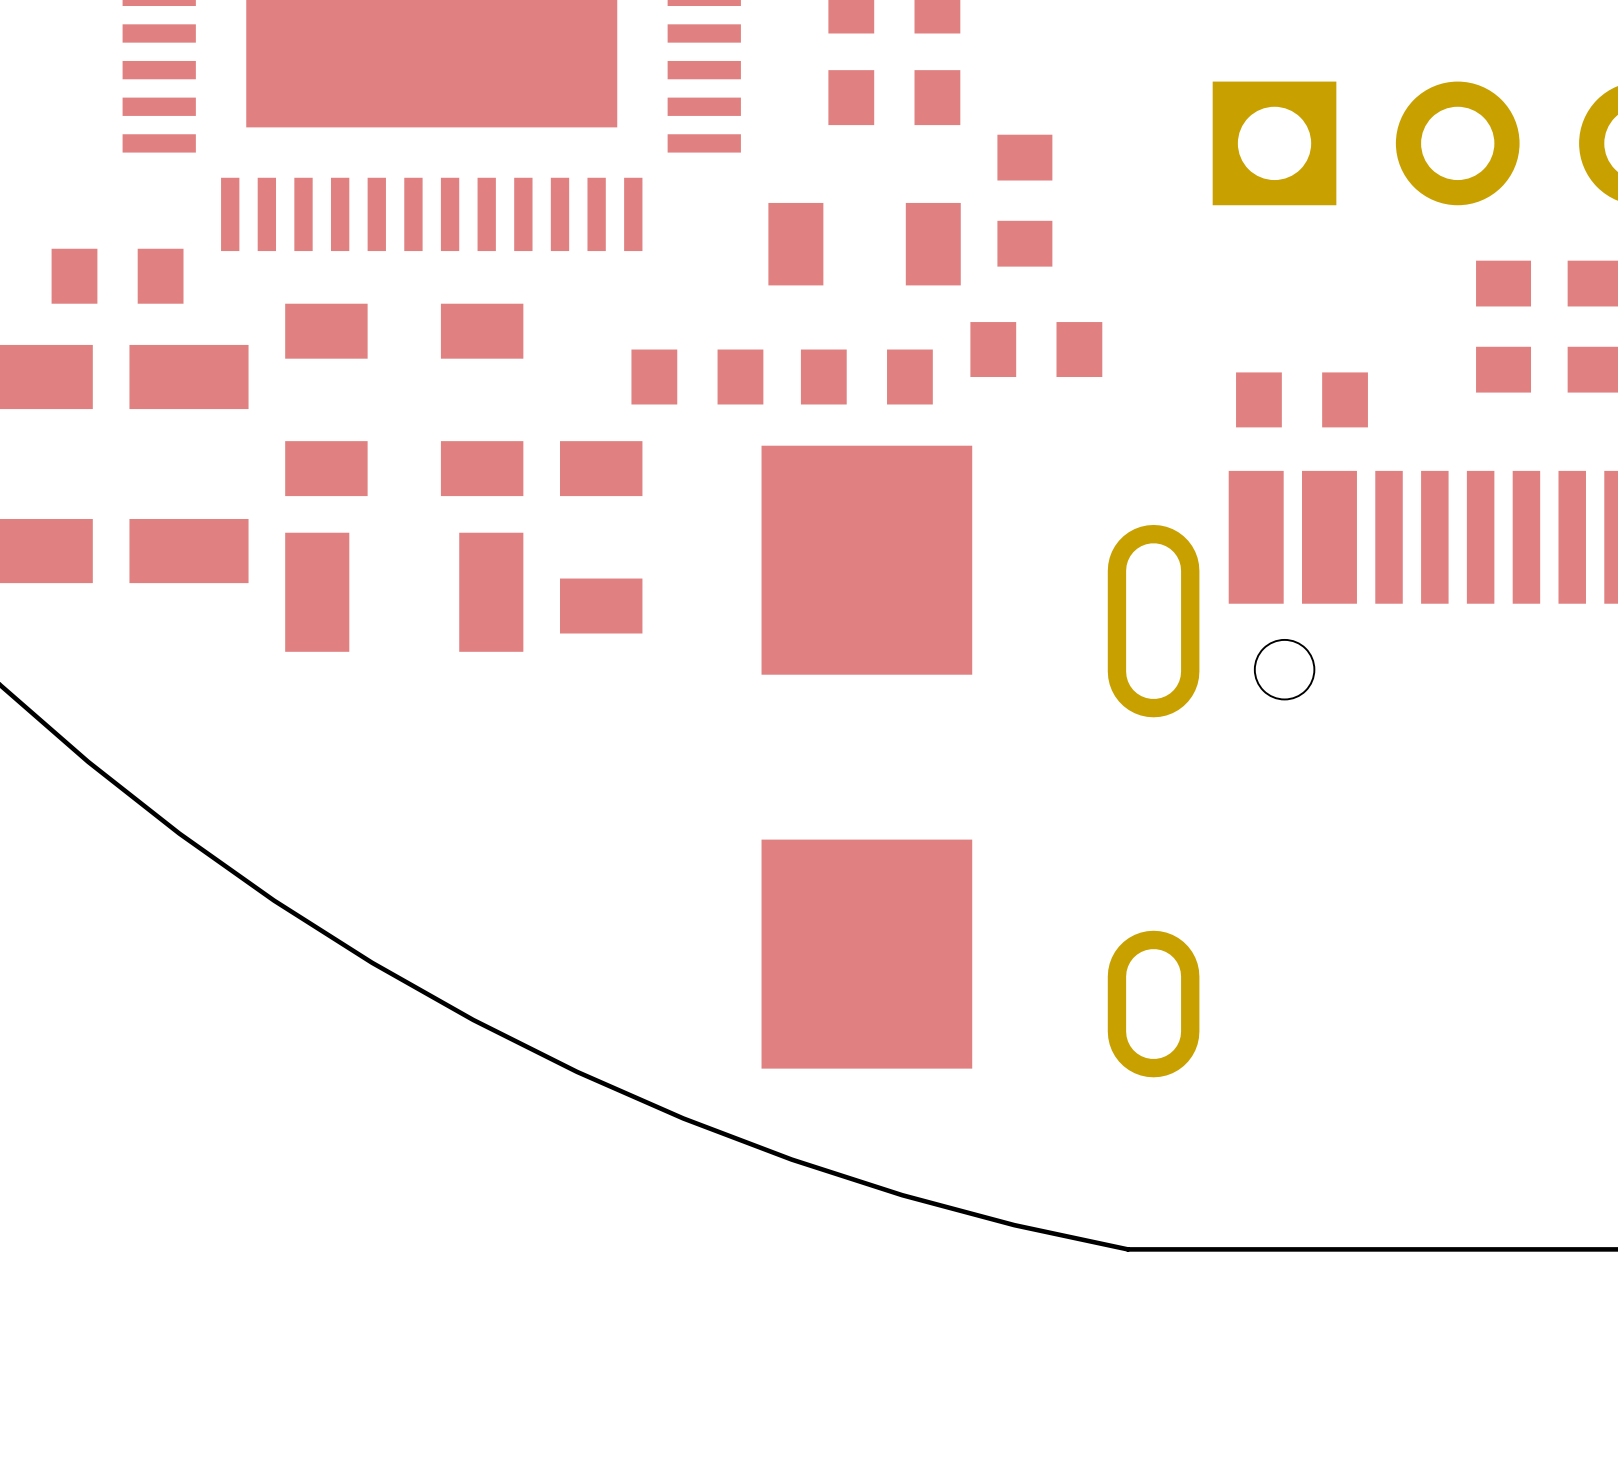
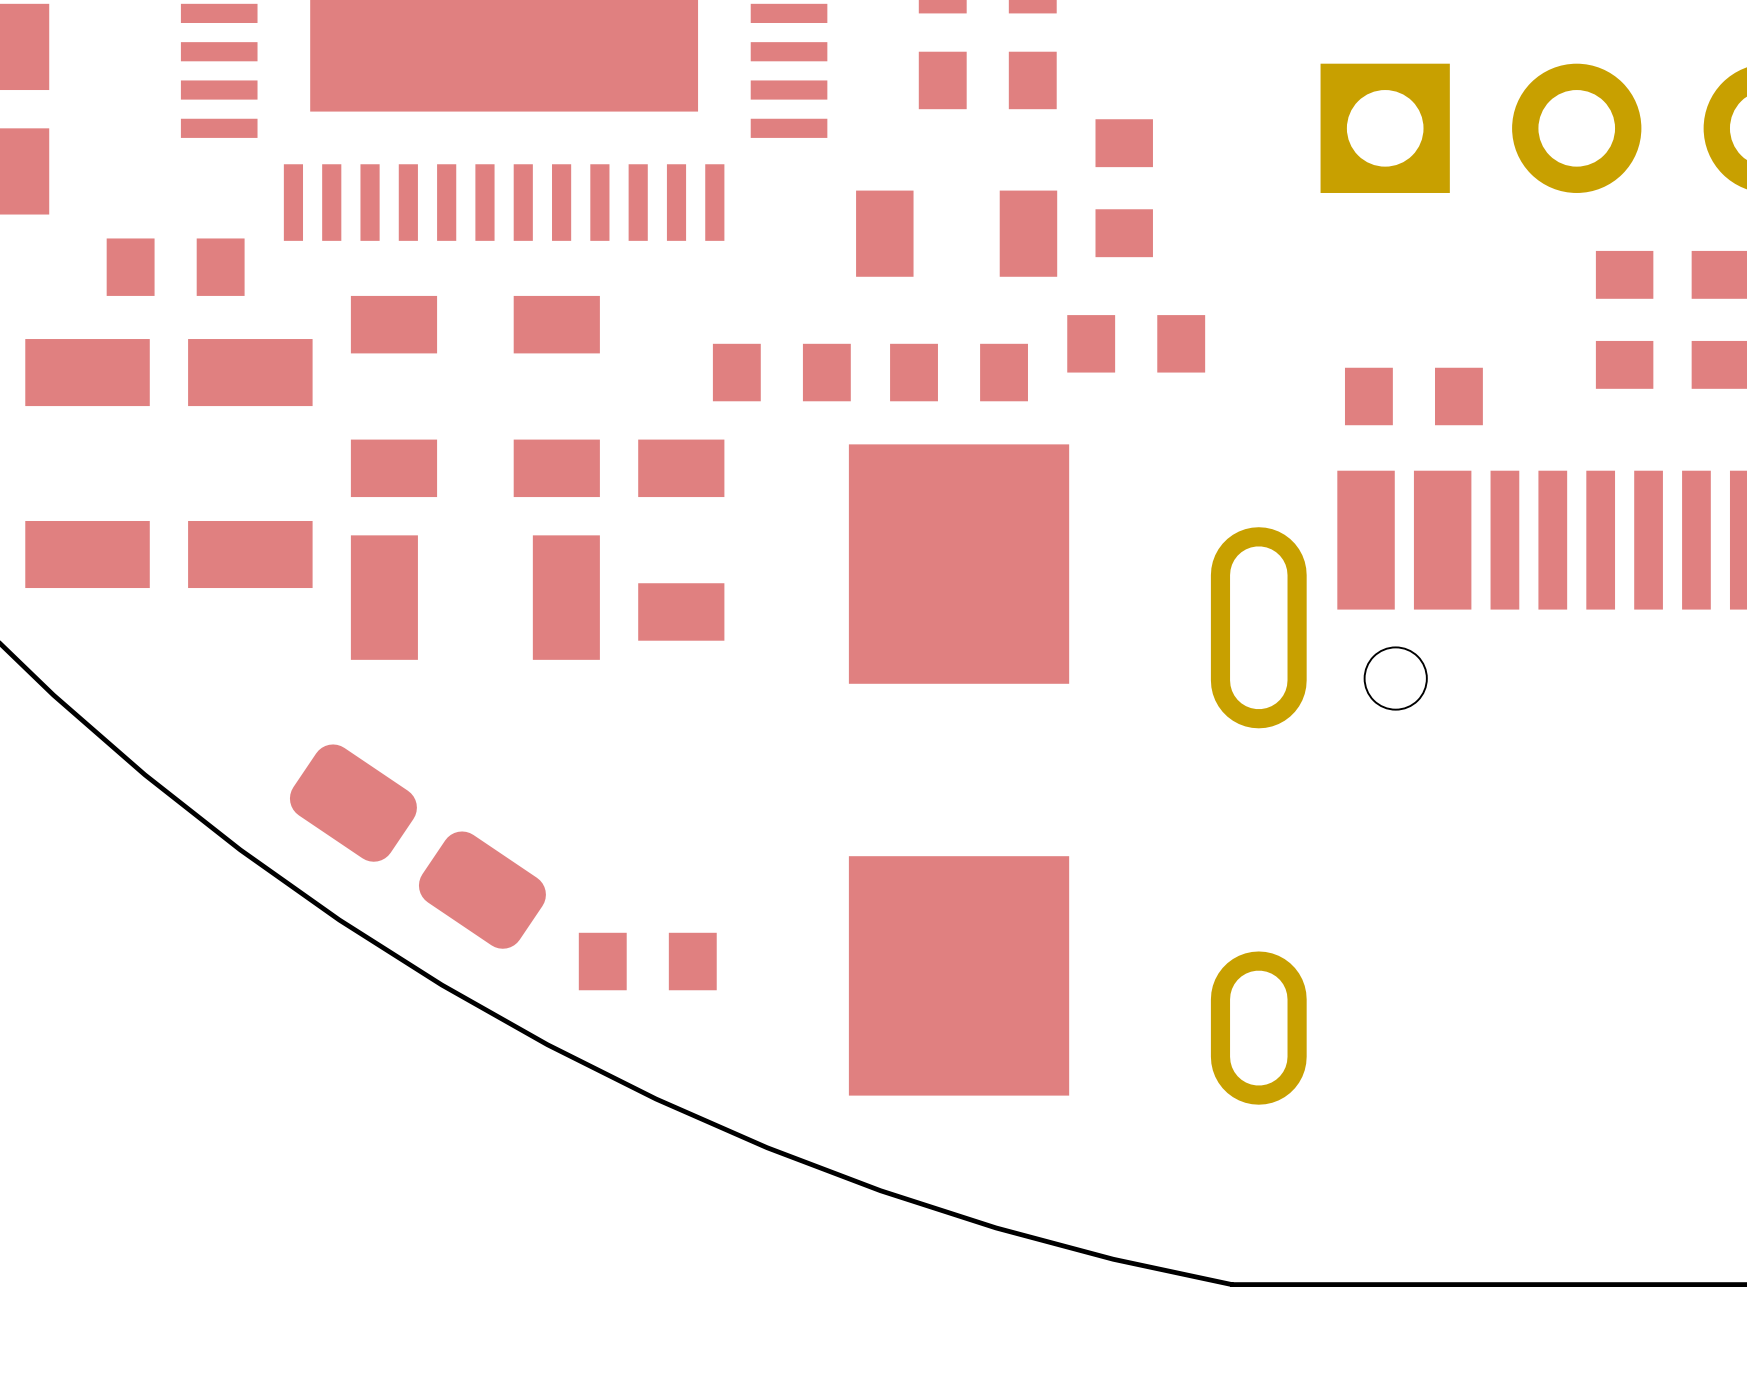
part: none -> (417, 846)
part: none -> (647, 961)

